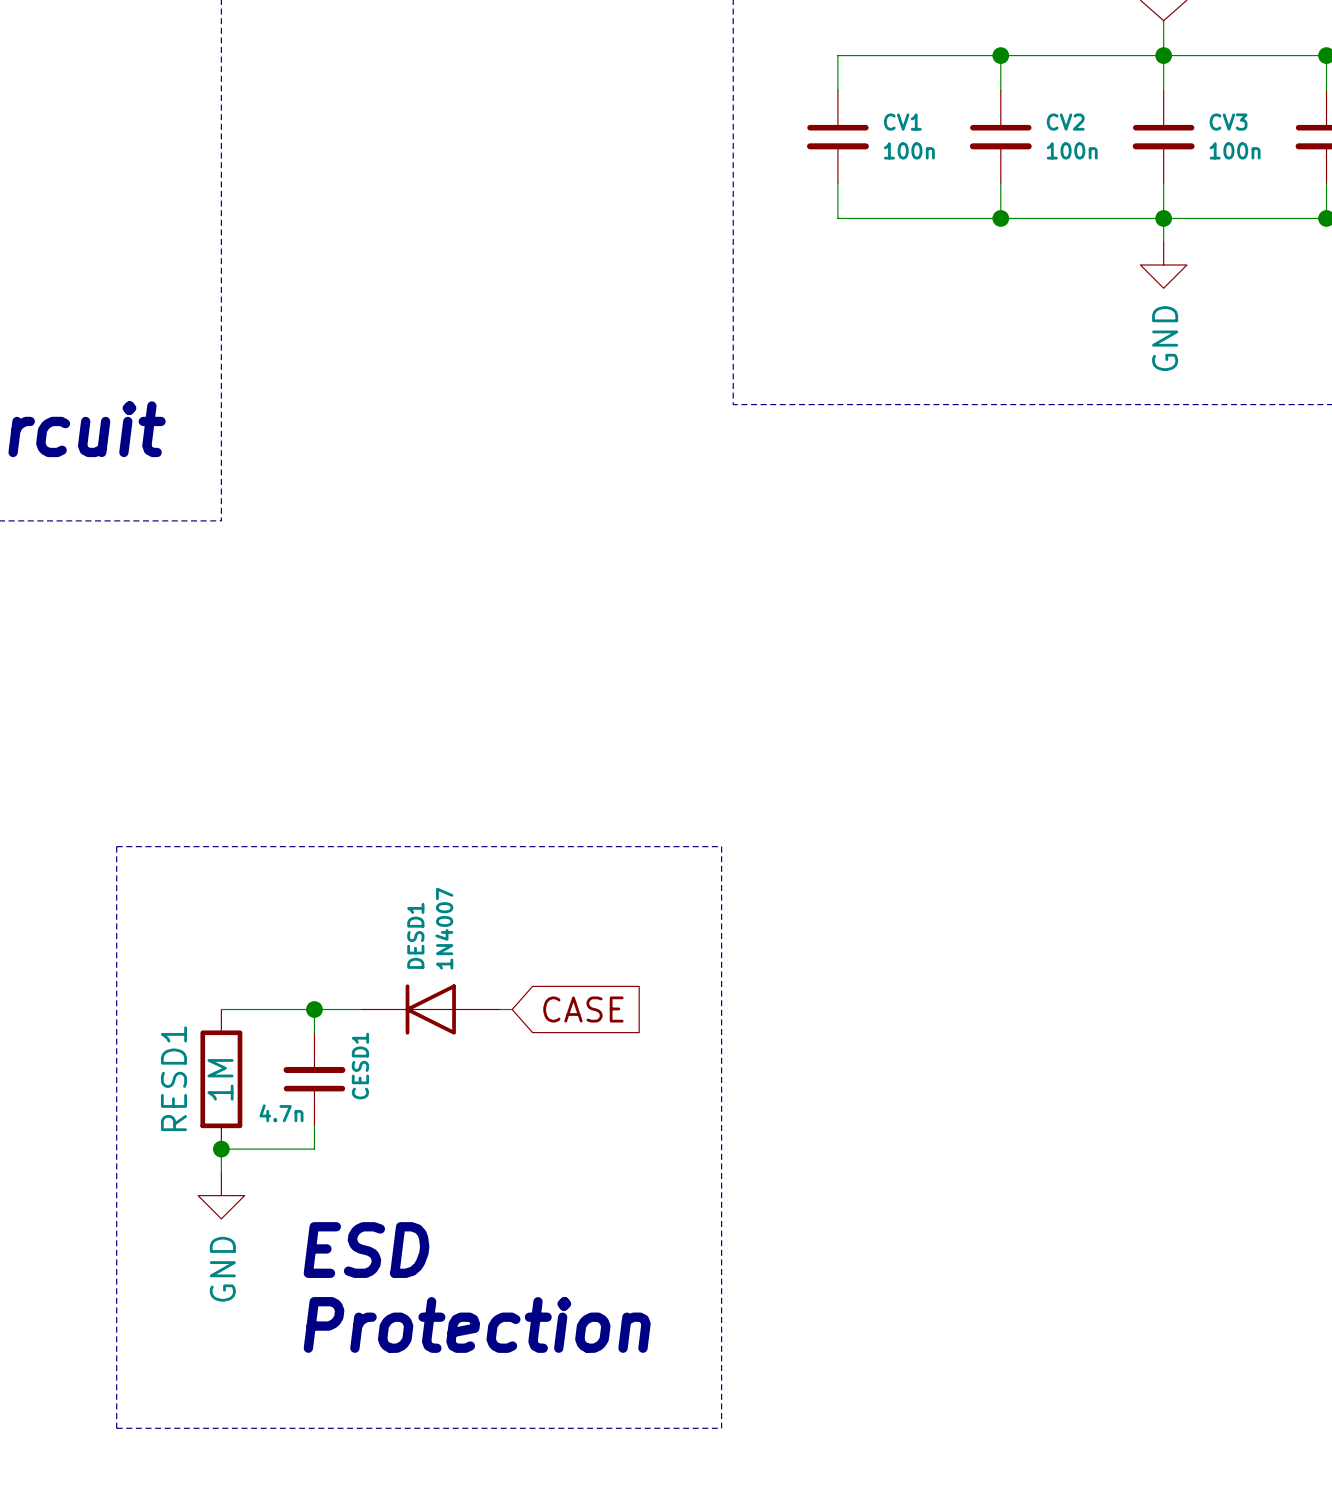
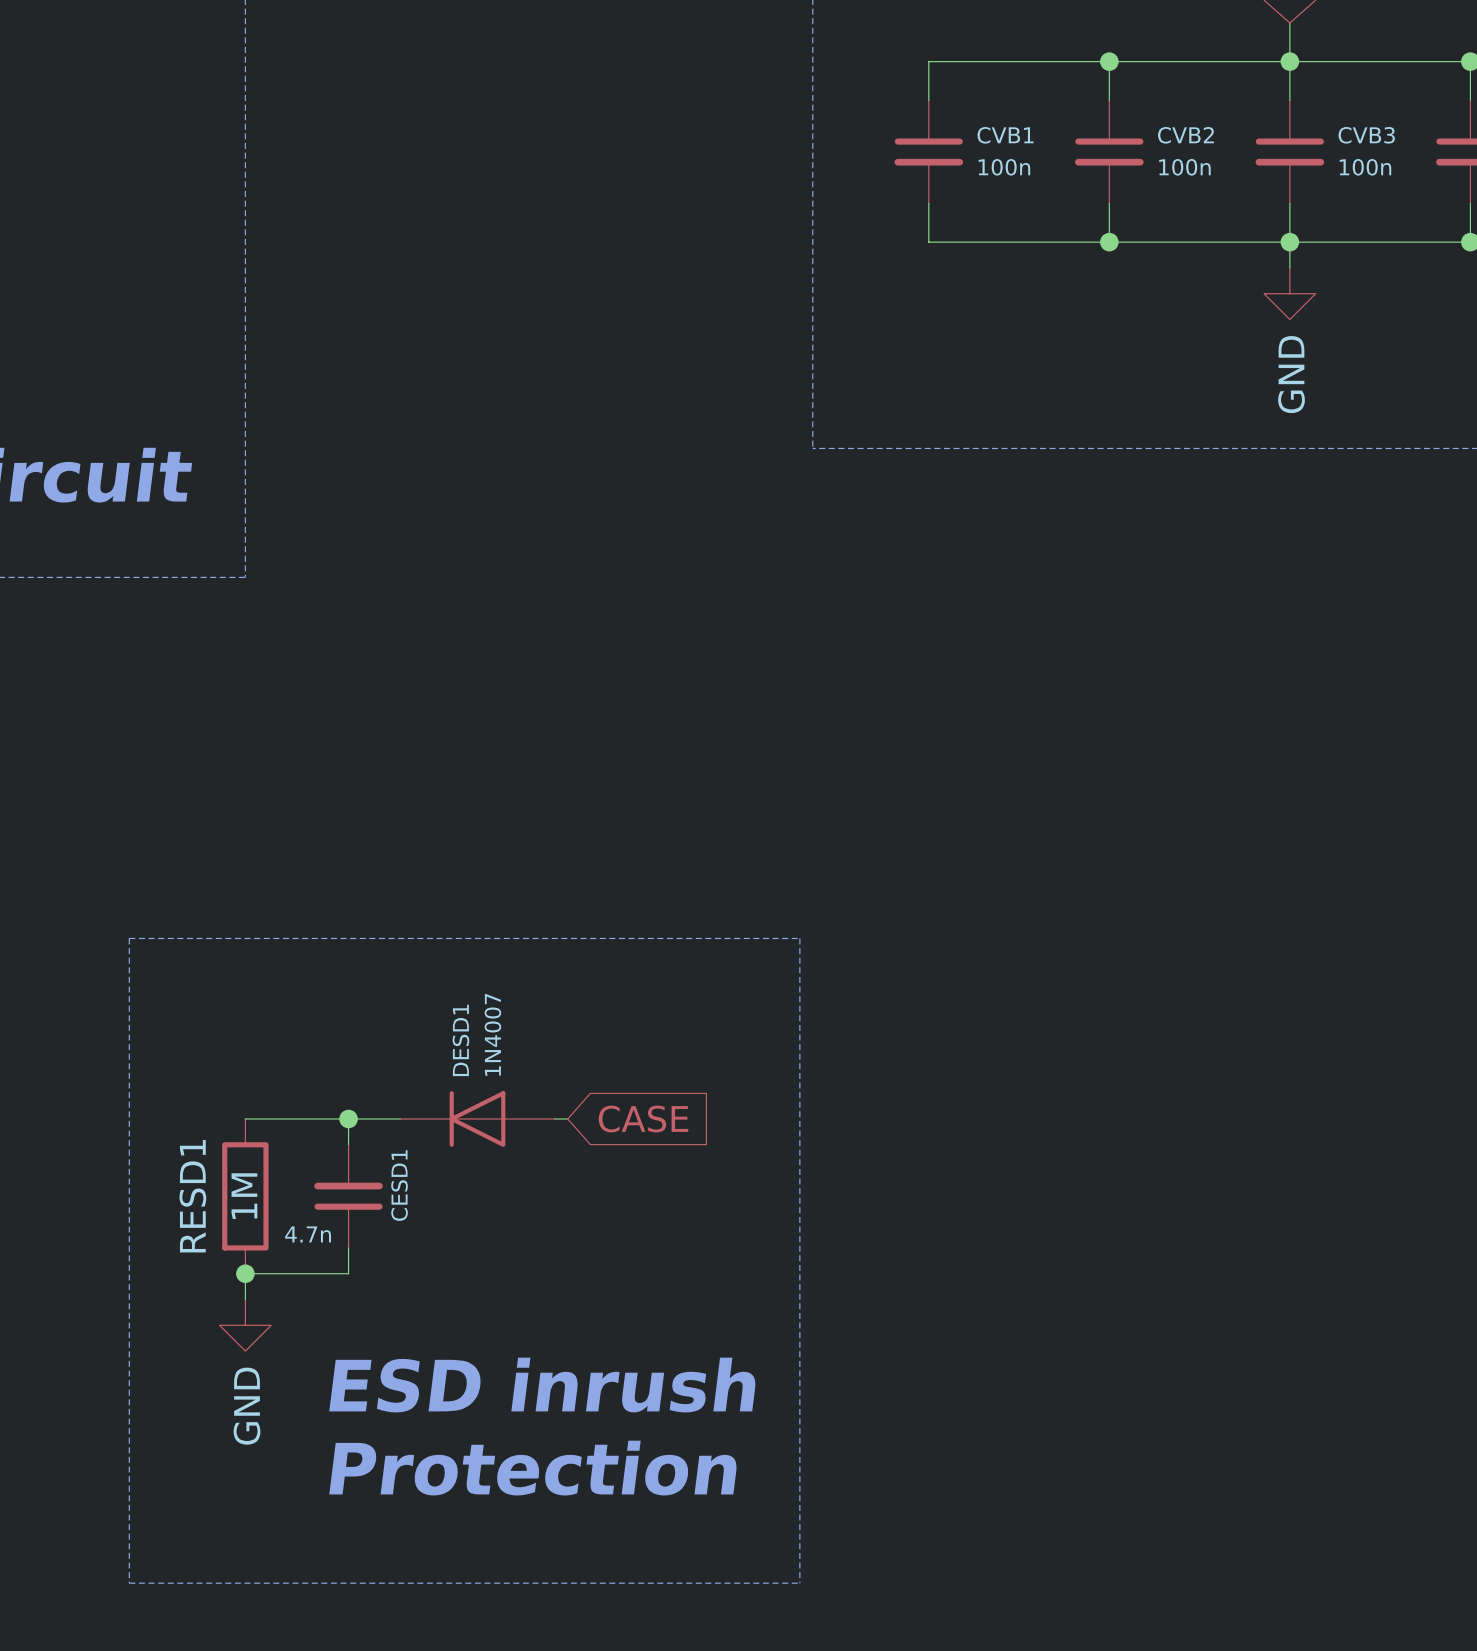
CV1 name: CV1 (902, 122) -> CVB1 (1005, 135)
CV2 name: CV2 (1065, 122) -> CVB2 (1185, 135)
CV3 name: CV3 (1228, 122) -> CVB3 (1366, 135)
text: ESD (366, 1250) -> ESD inrush (542, 1385)

